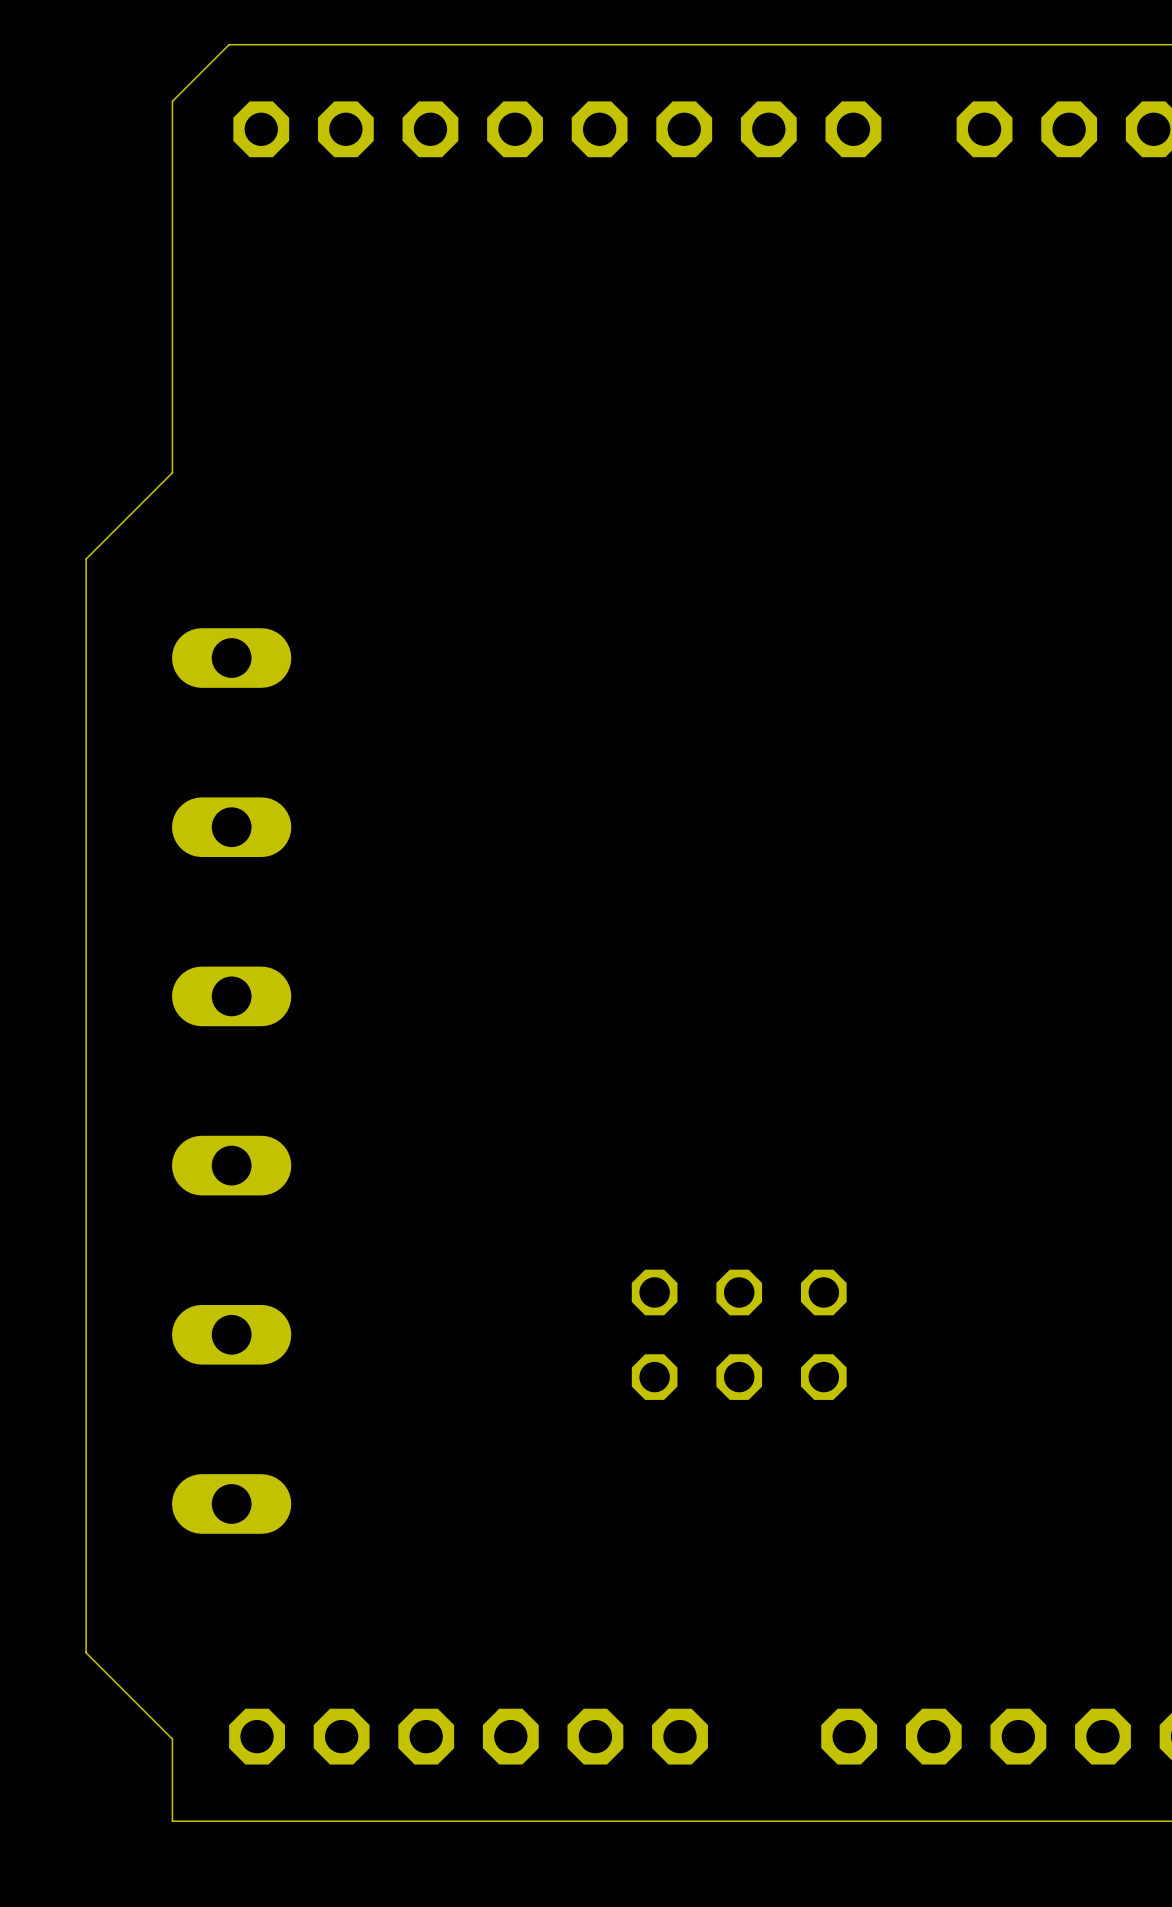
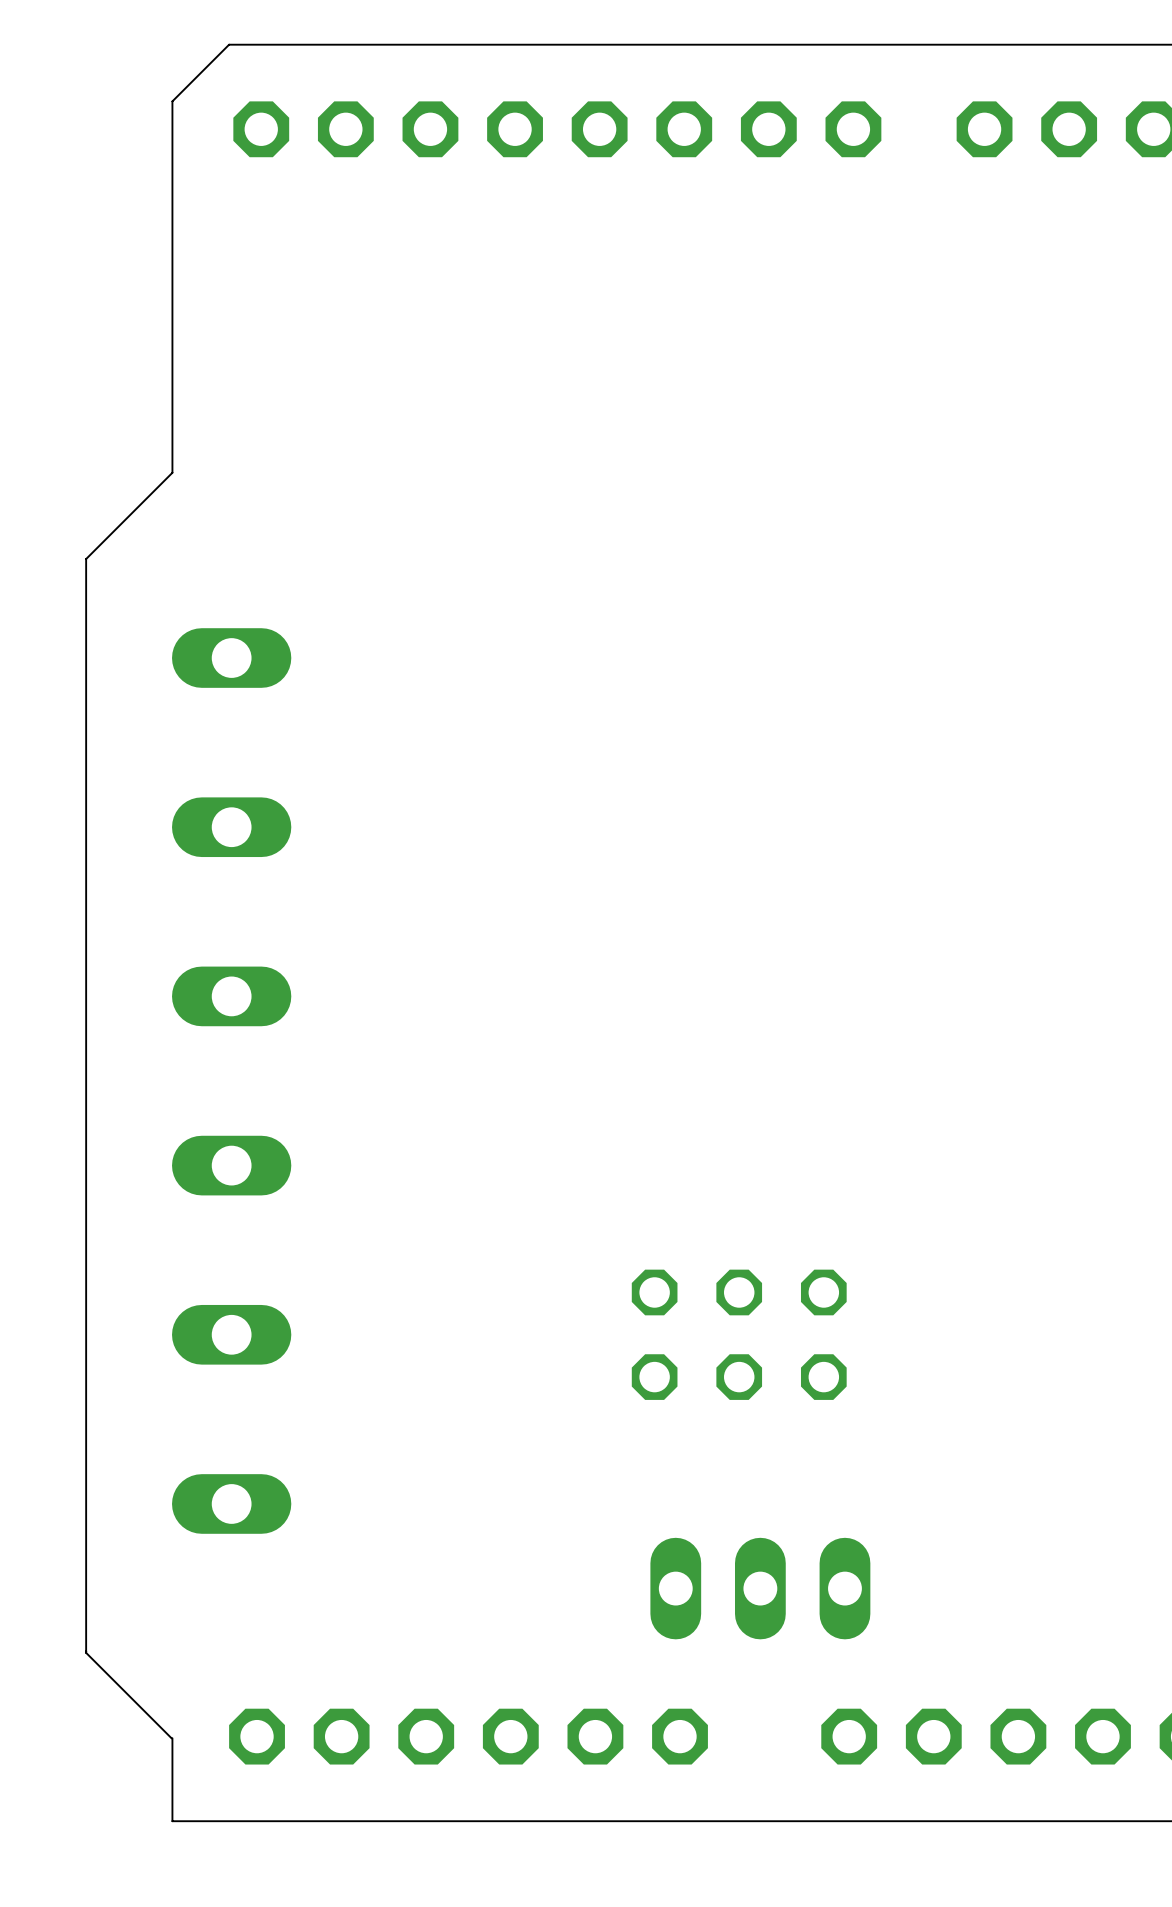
part: none -> (760, 1588)

